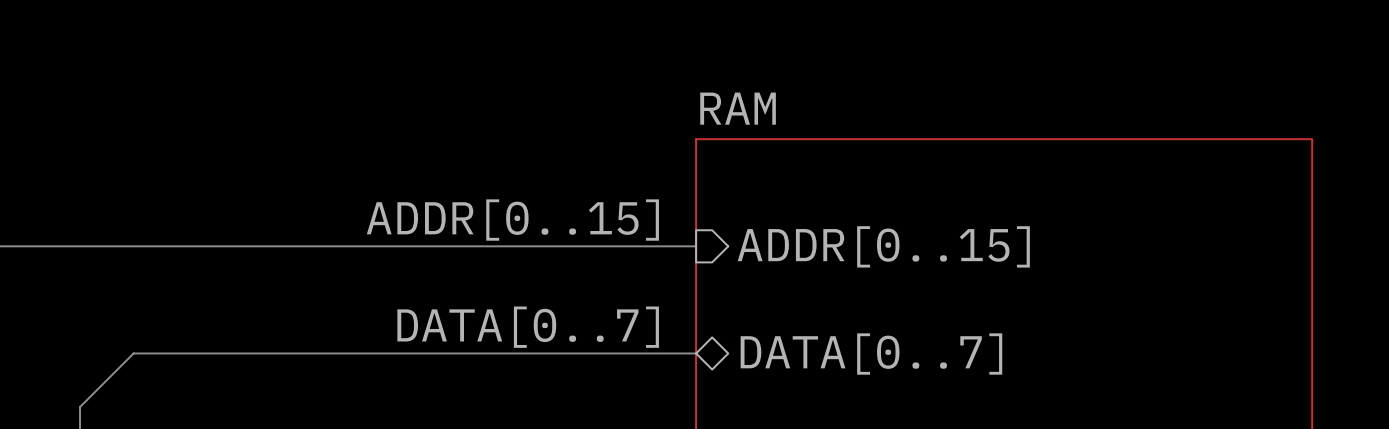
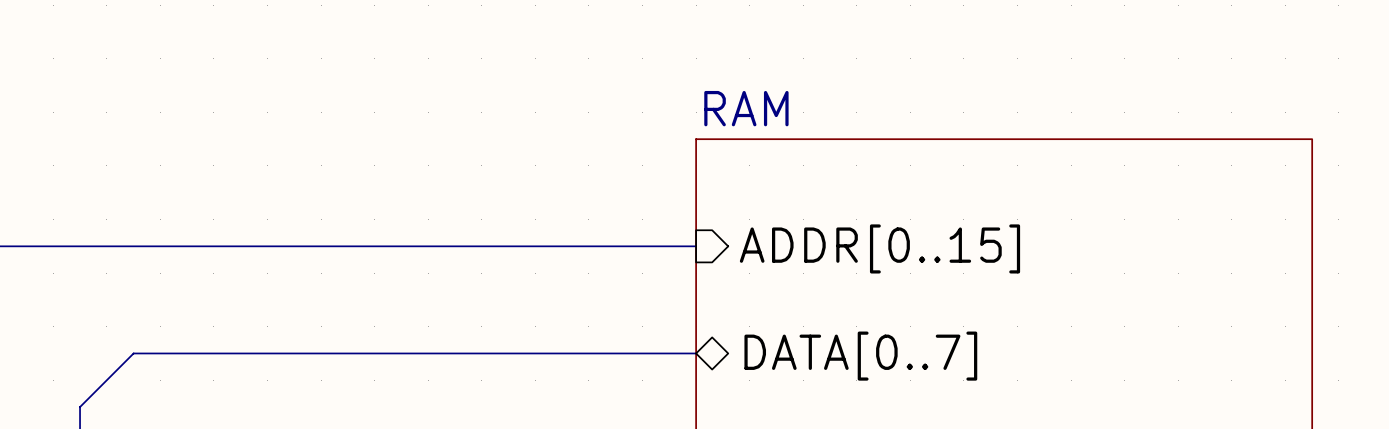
label: ADDR[0..15] (512, 220) -> none
label: DATA[0..7] (528, 327) -> none

